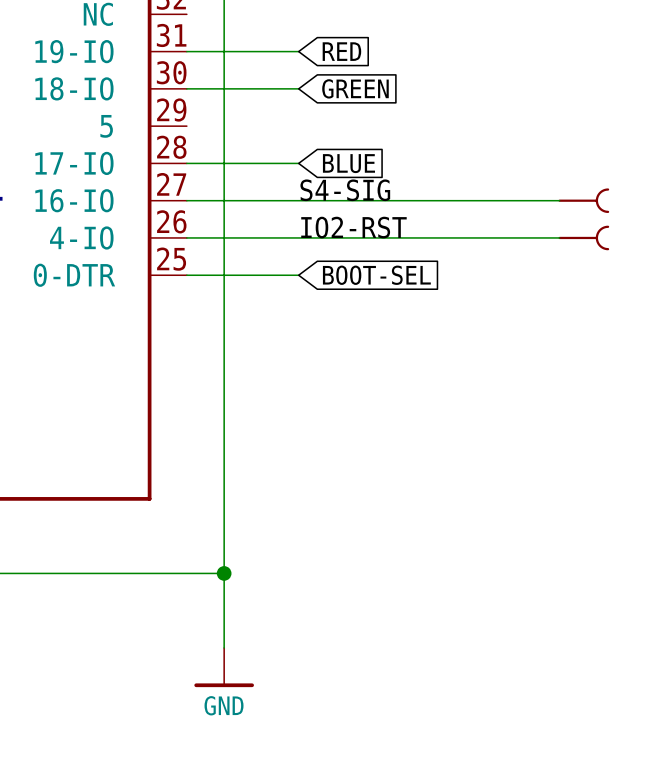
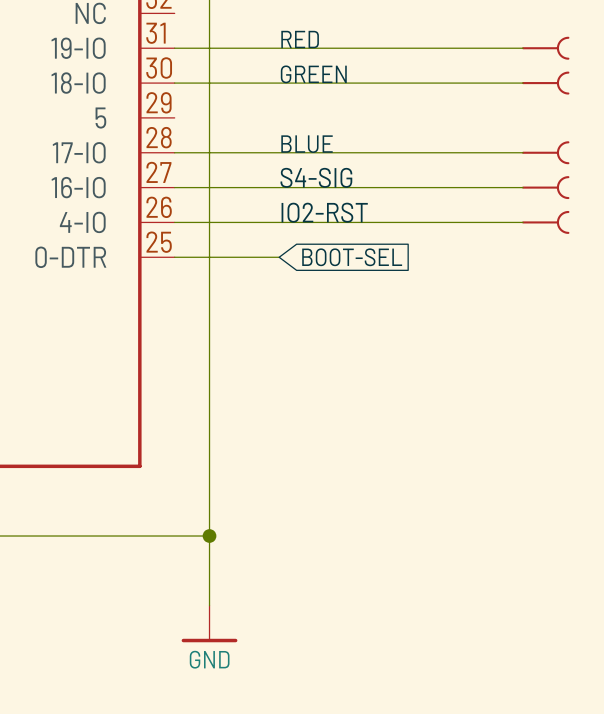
label: none -> RED (300, 39)
wire: none -> (279, 48) (523, 48)
global label: RED (341, 51) -> none
part: none -> (545, 48)
label: none -> GREEN (313, 74)
wire: none -> (279, 83) (523, 83)
global label: GREEN (355, 88) -> none
part: none -> (545, 83)
label: none -> BLUE (307, 144)
wire: none -> (279, 152) (523, 152)
global label: BLUE (348, 163) -> none
part: none -> (545, 152)

